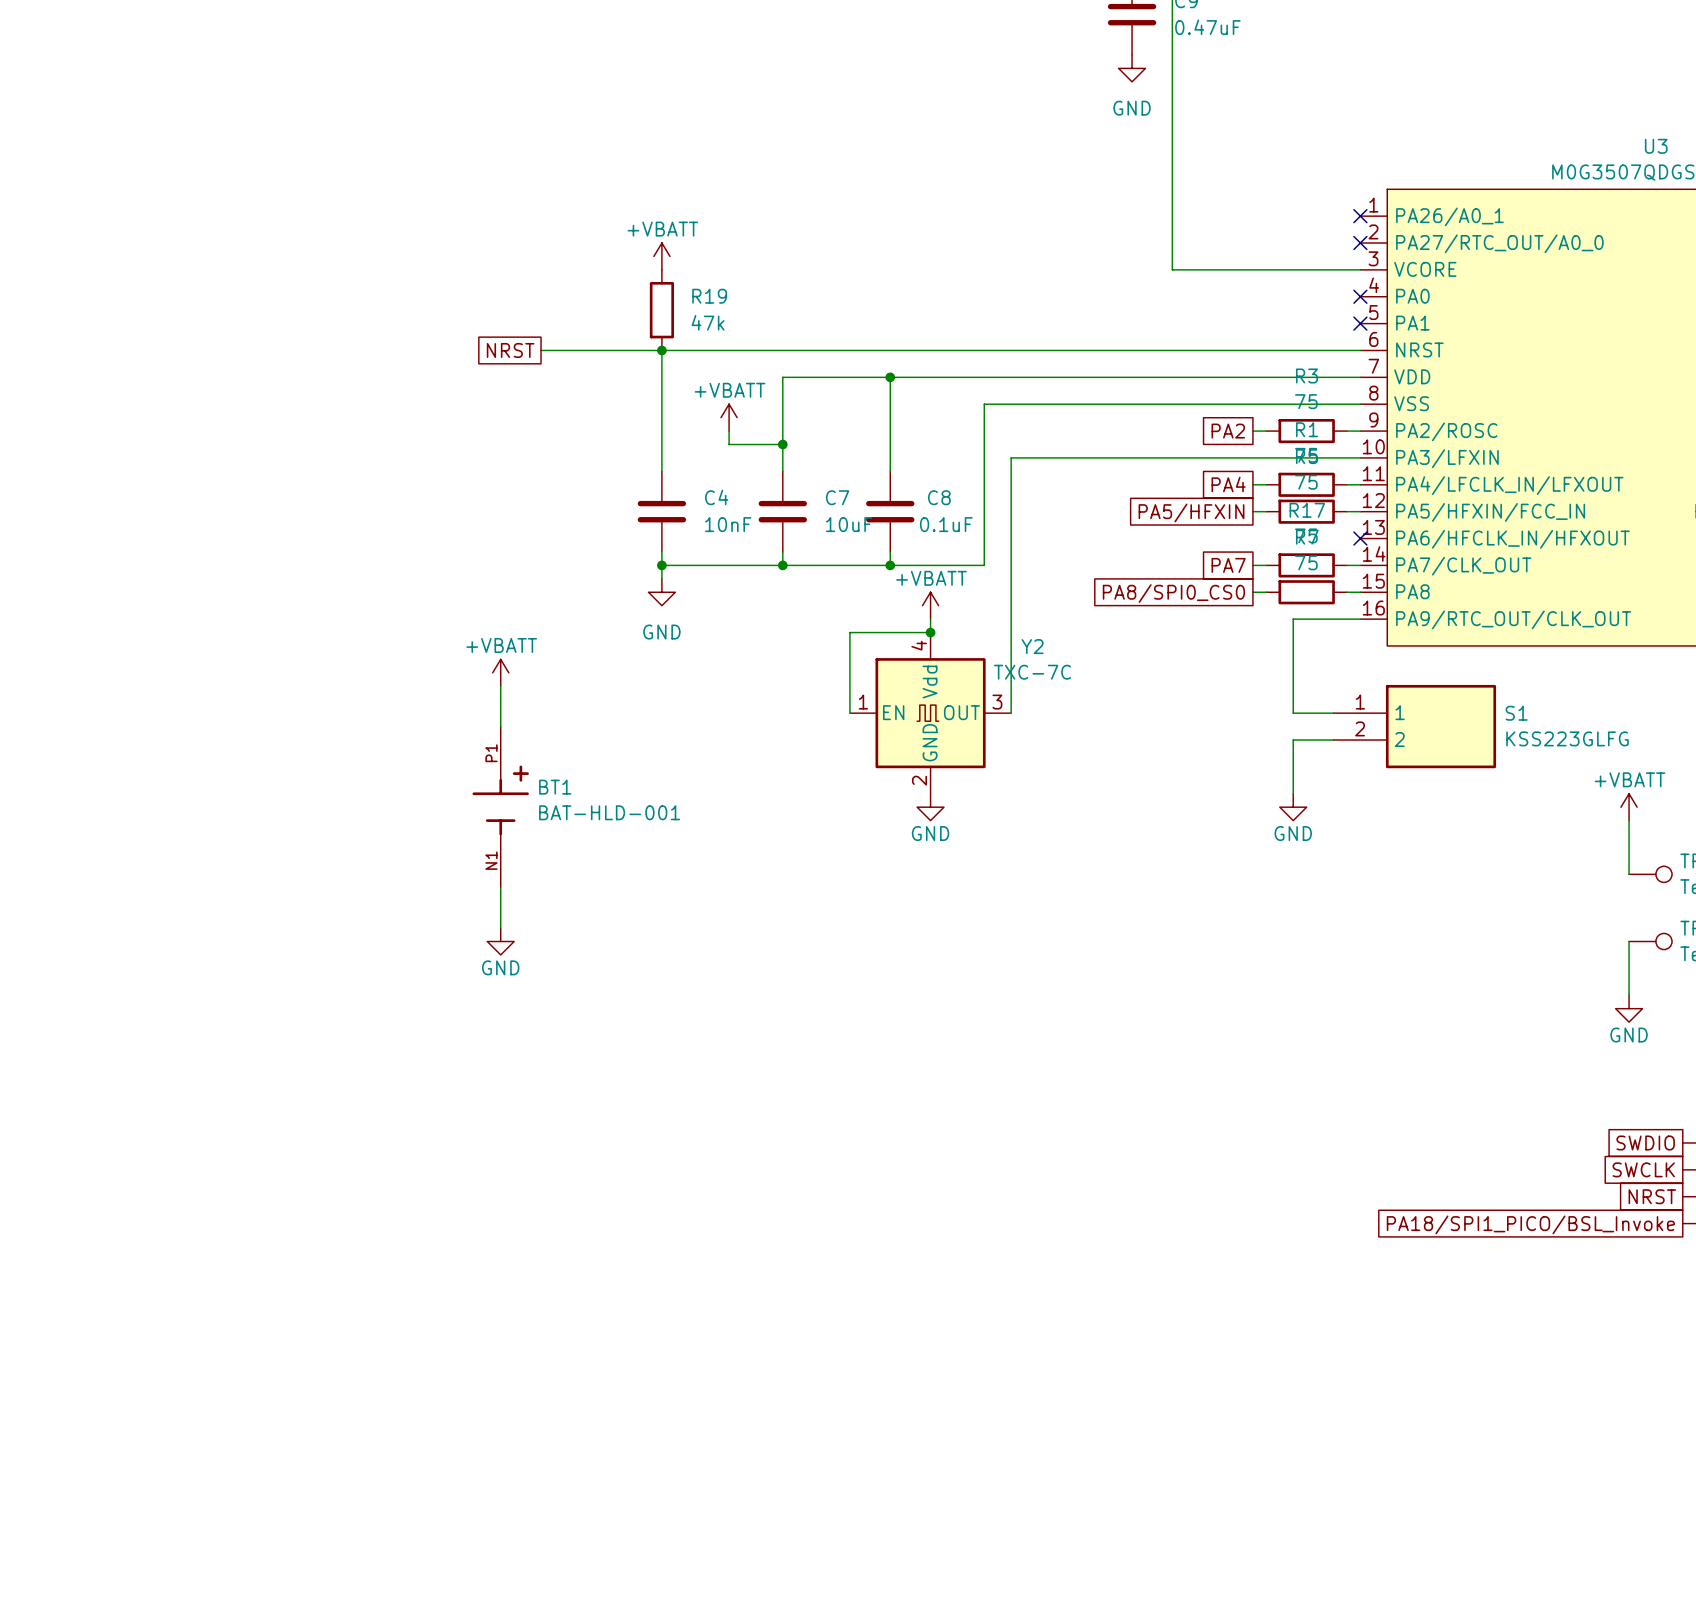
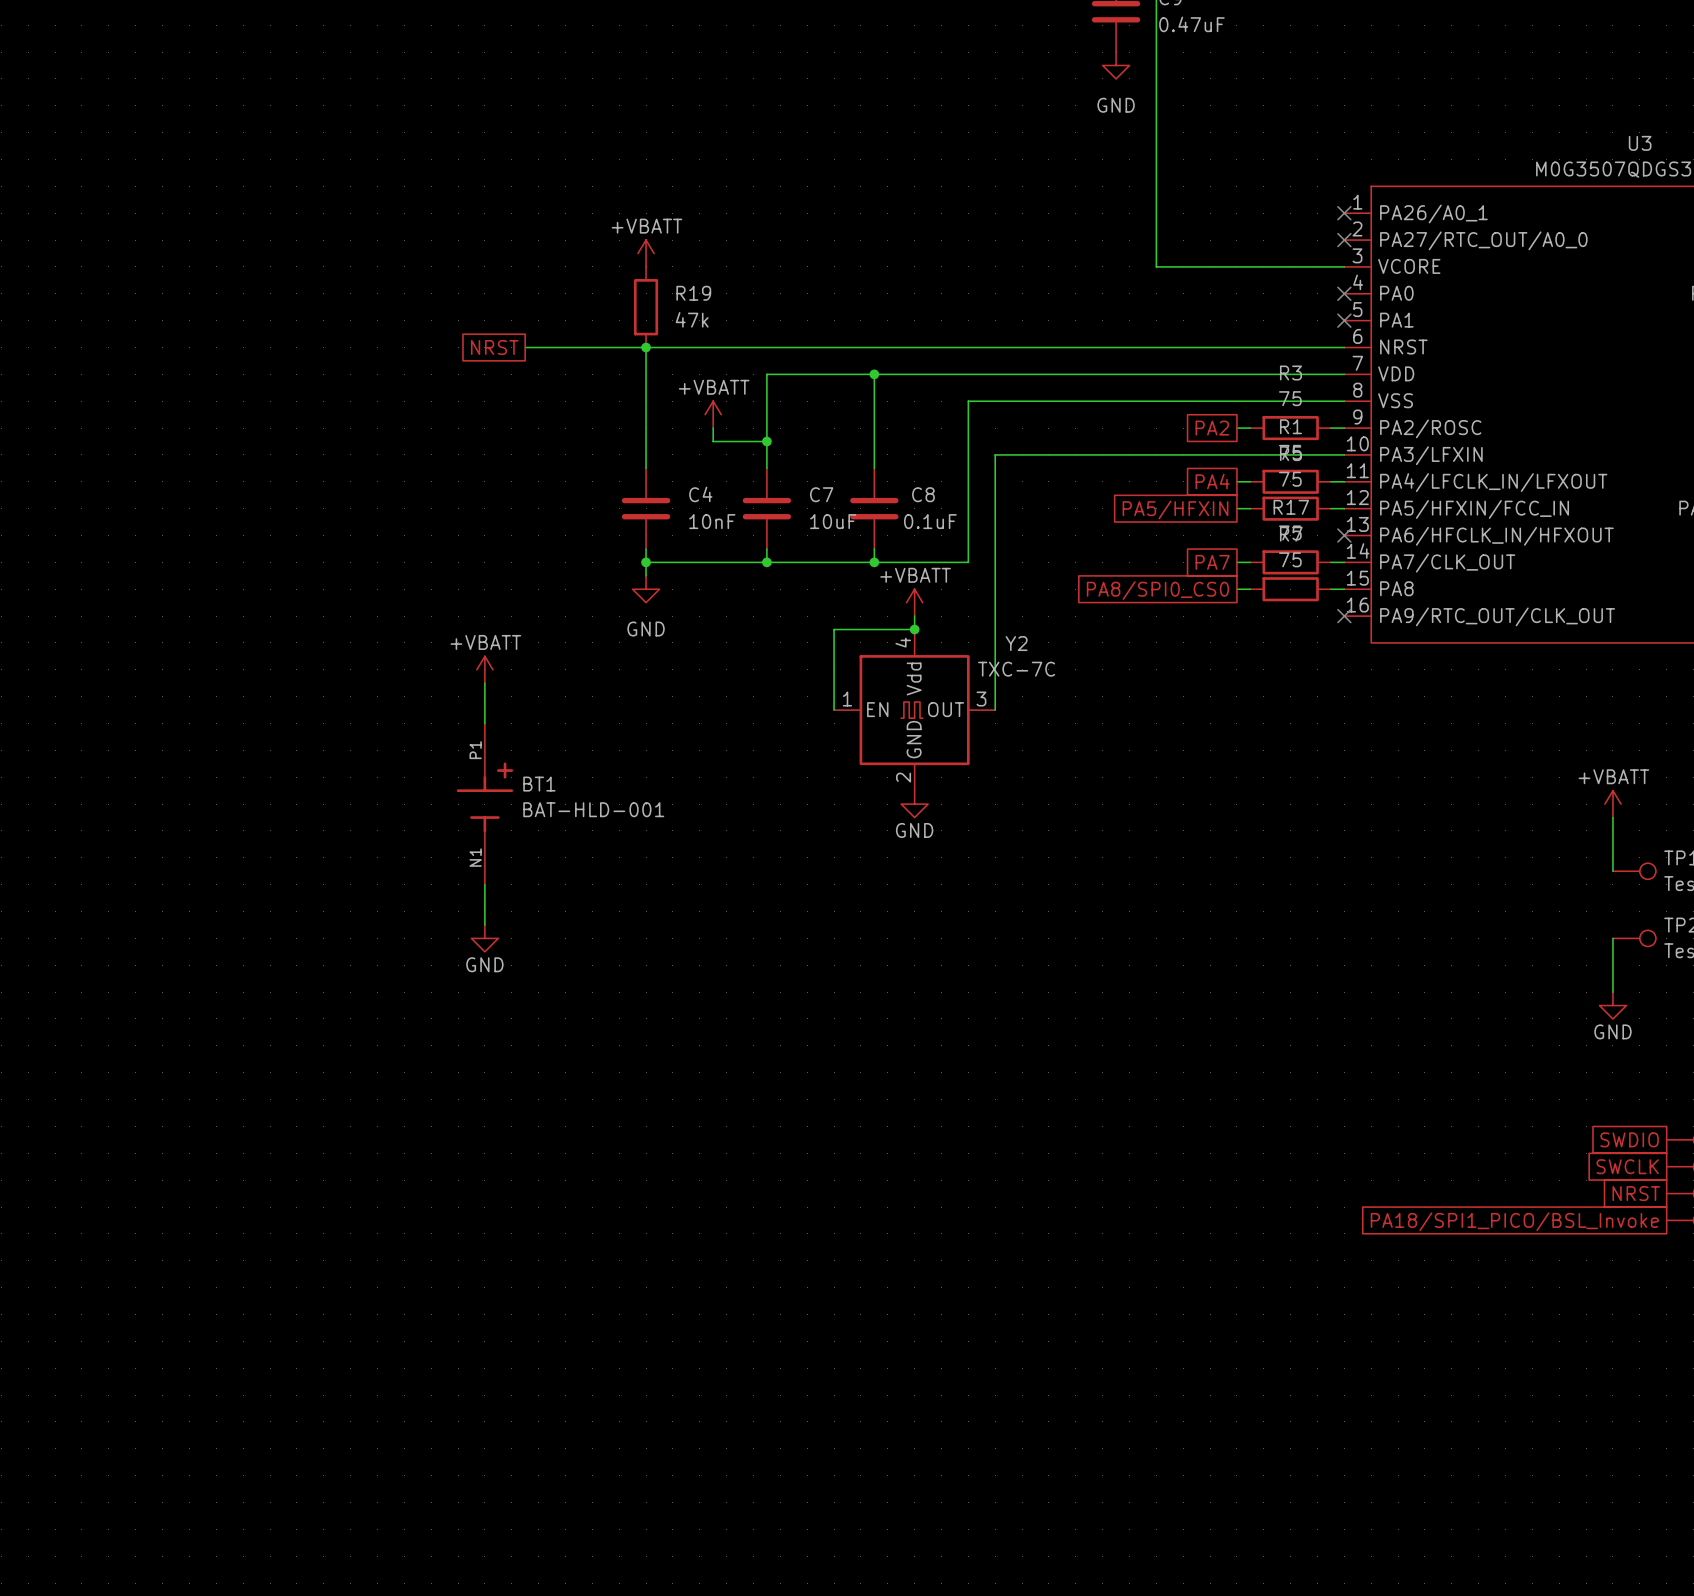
wire: (1360, 619) (1293, 619) (1293, 713) (1333, 713) -> none
no-connect mark: none -> (1344, 616)
S1: KSS223GLFG (1414, 726) -> none
wire: (1333, 740) (1293, 740) (1293, 793) -> none
power symbol: GND (1293, 807) -> none

